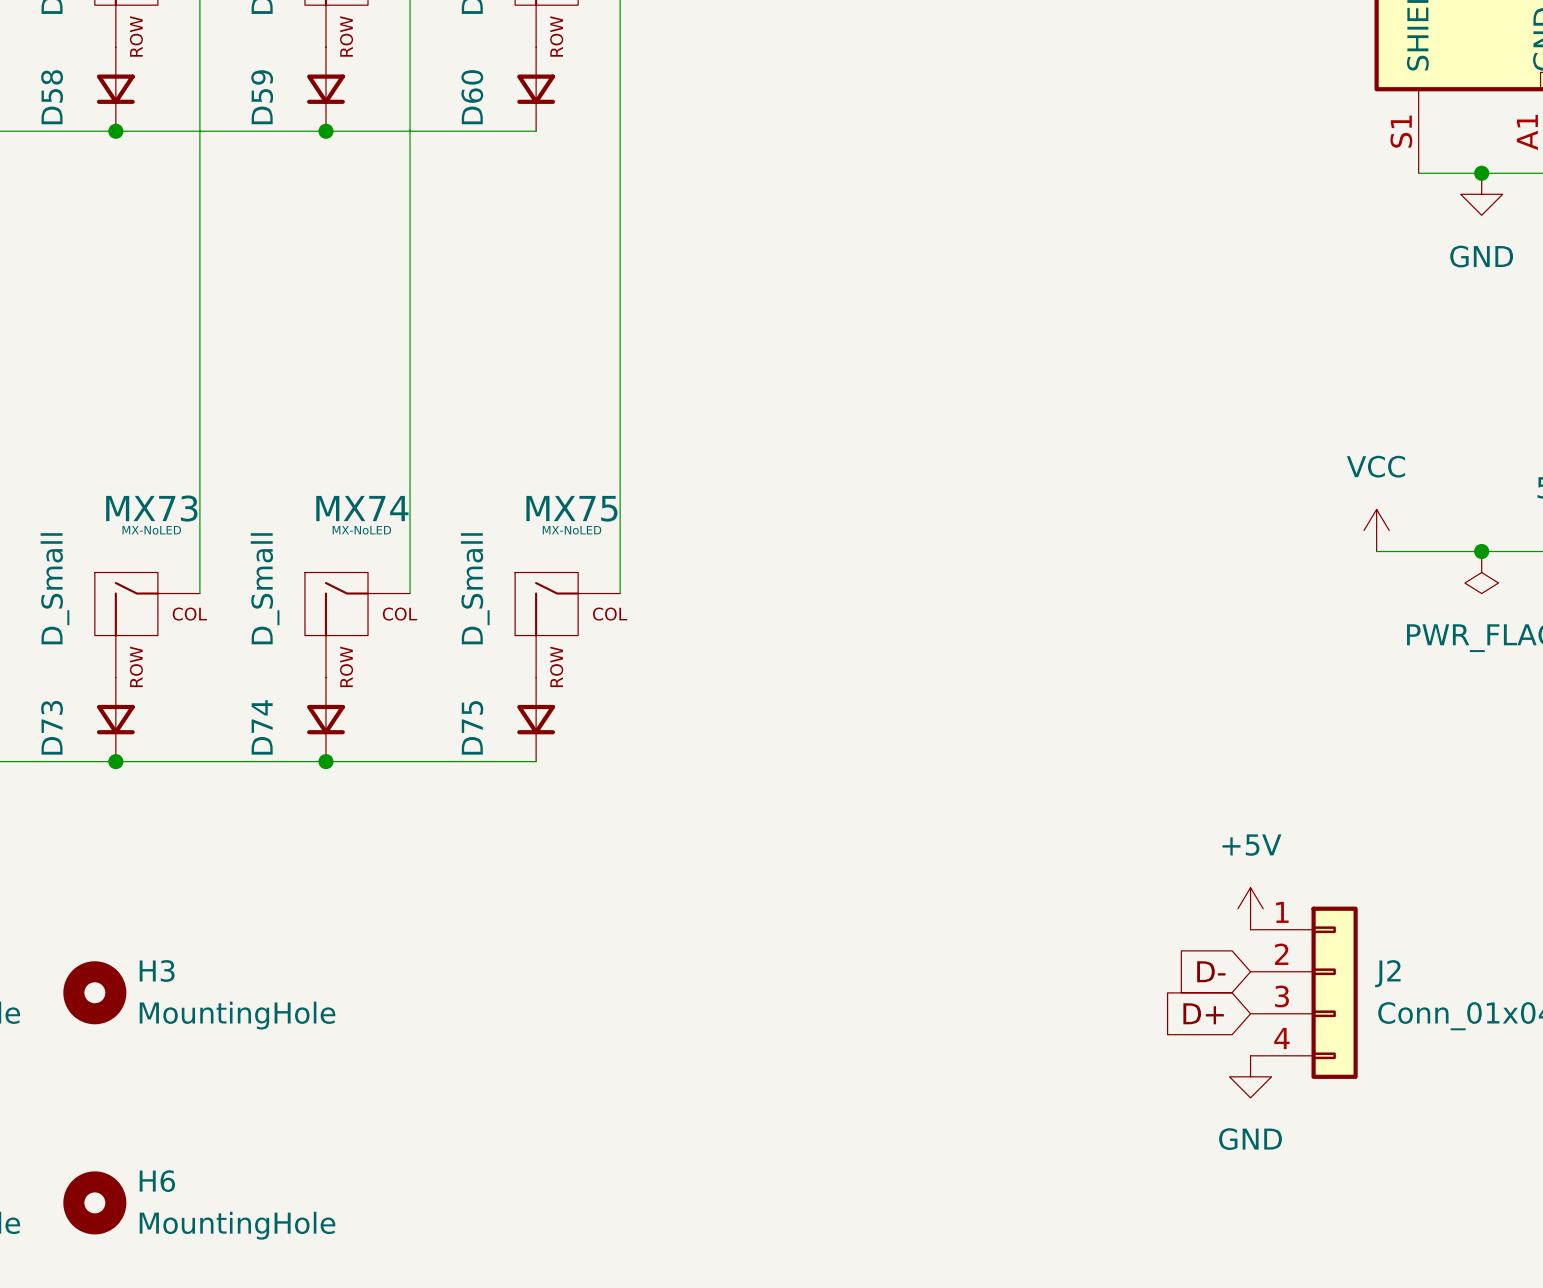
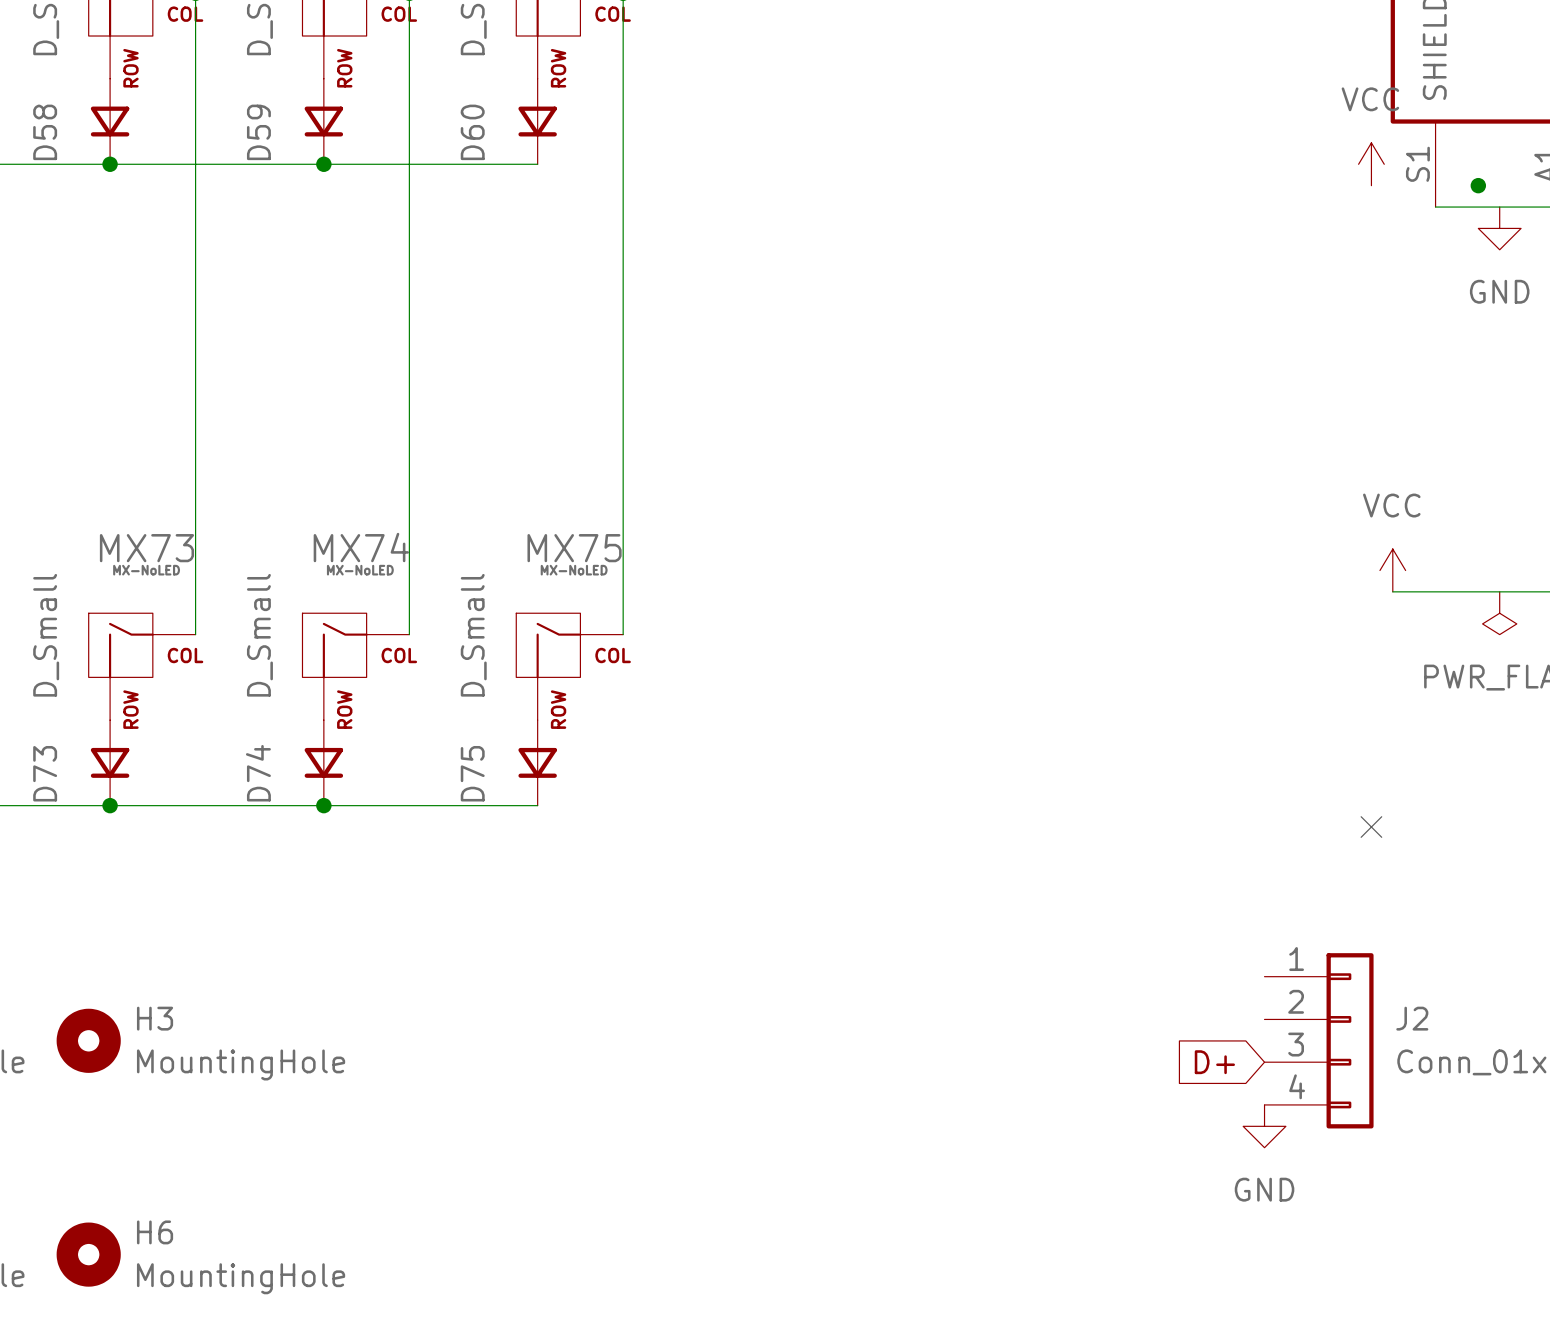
power symbol: none -> VCC (1371, 164)
junction position: (1481, 173) -> (1478, 185)
junction: (1481, 551) -> none
no-connect mark: none -> (1371, 827)
power symbol: +5V (1250, 908) -> none
global label: D- (1211, 971) -> none

